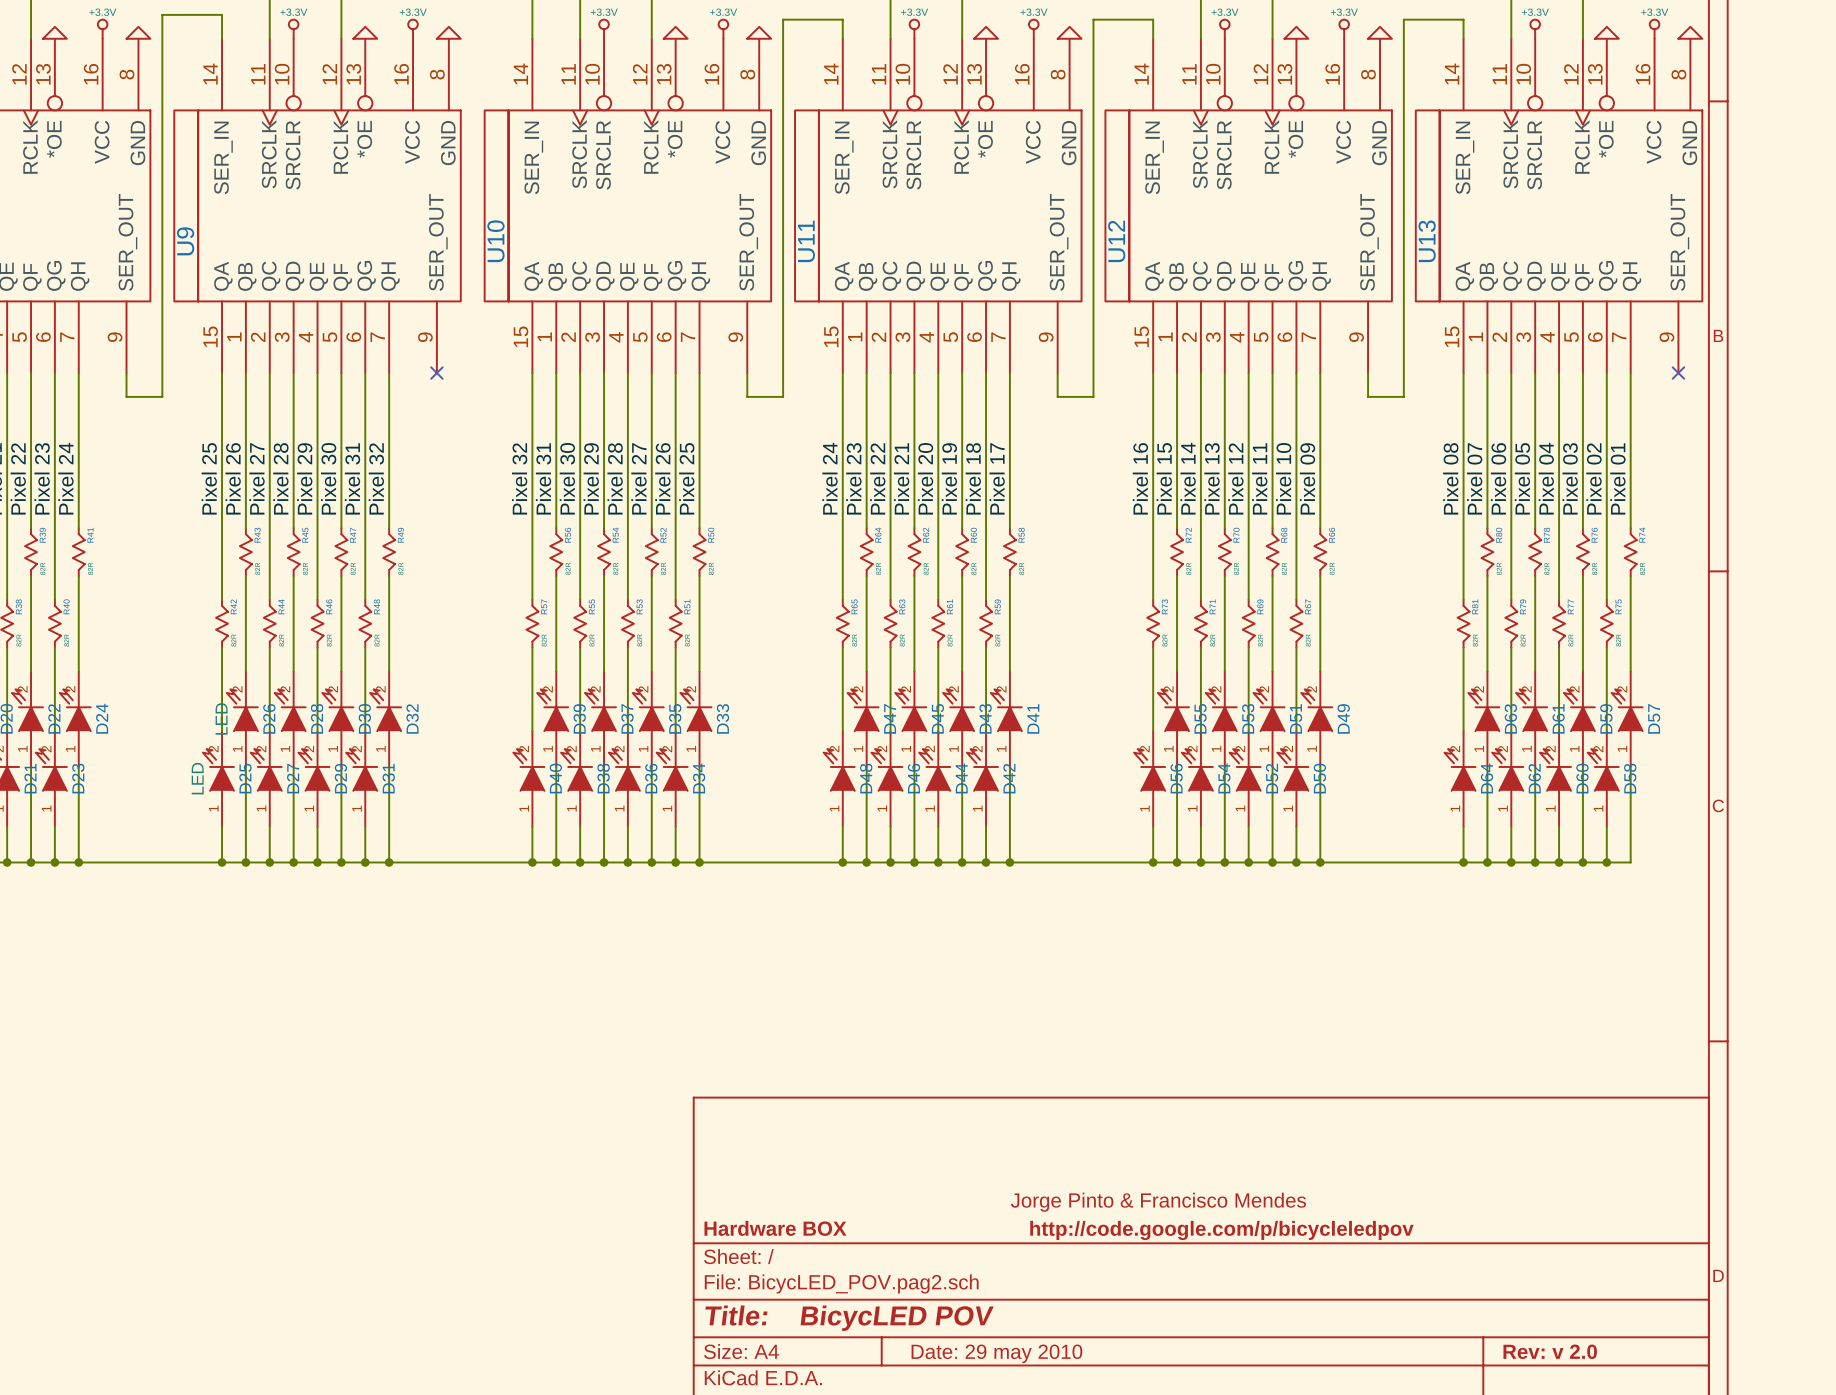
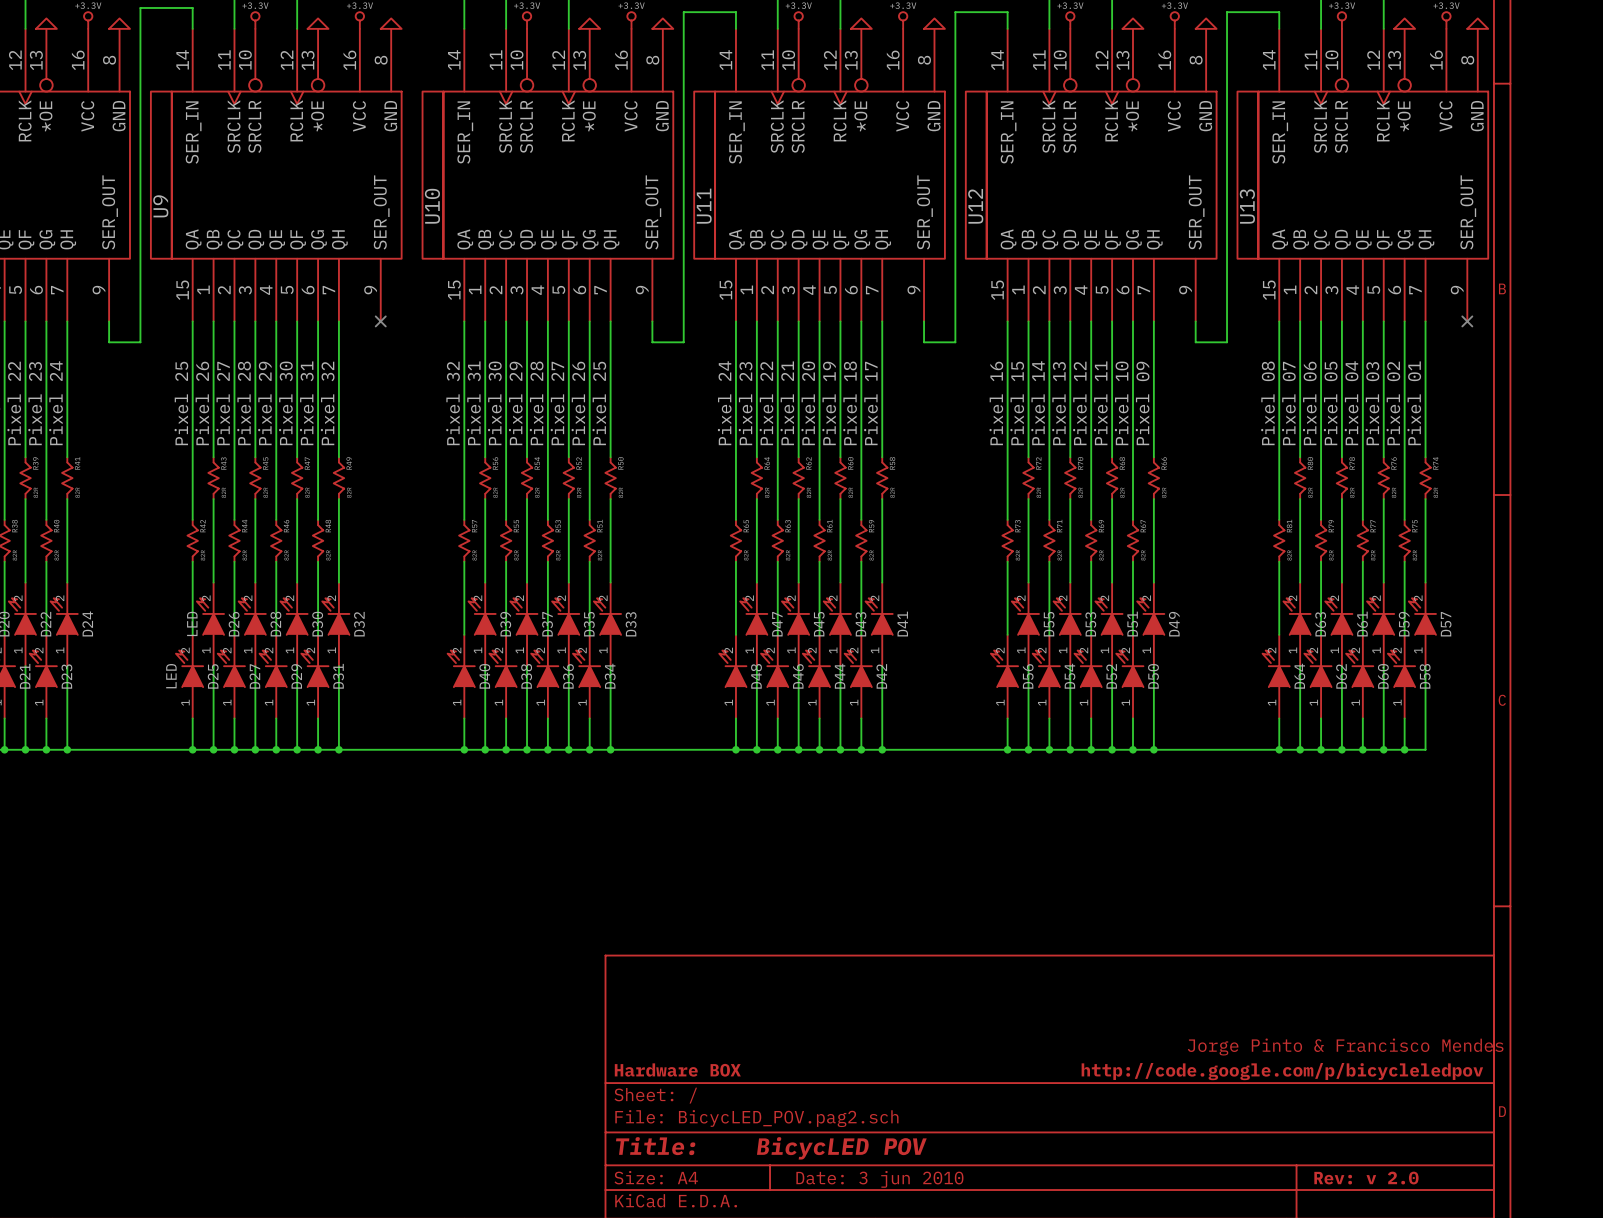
title block: Date: 29 may 2010 (996, 1353) -> Date: 3 jun 2010 (879, 1179)

